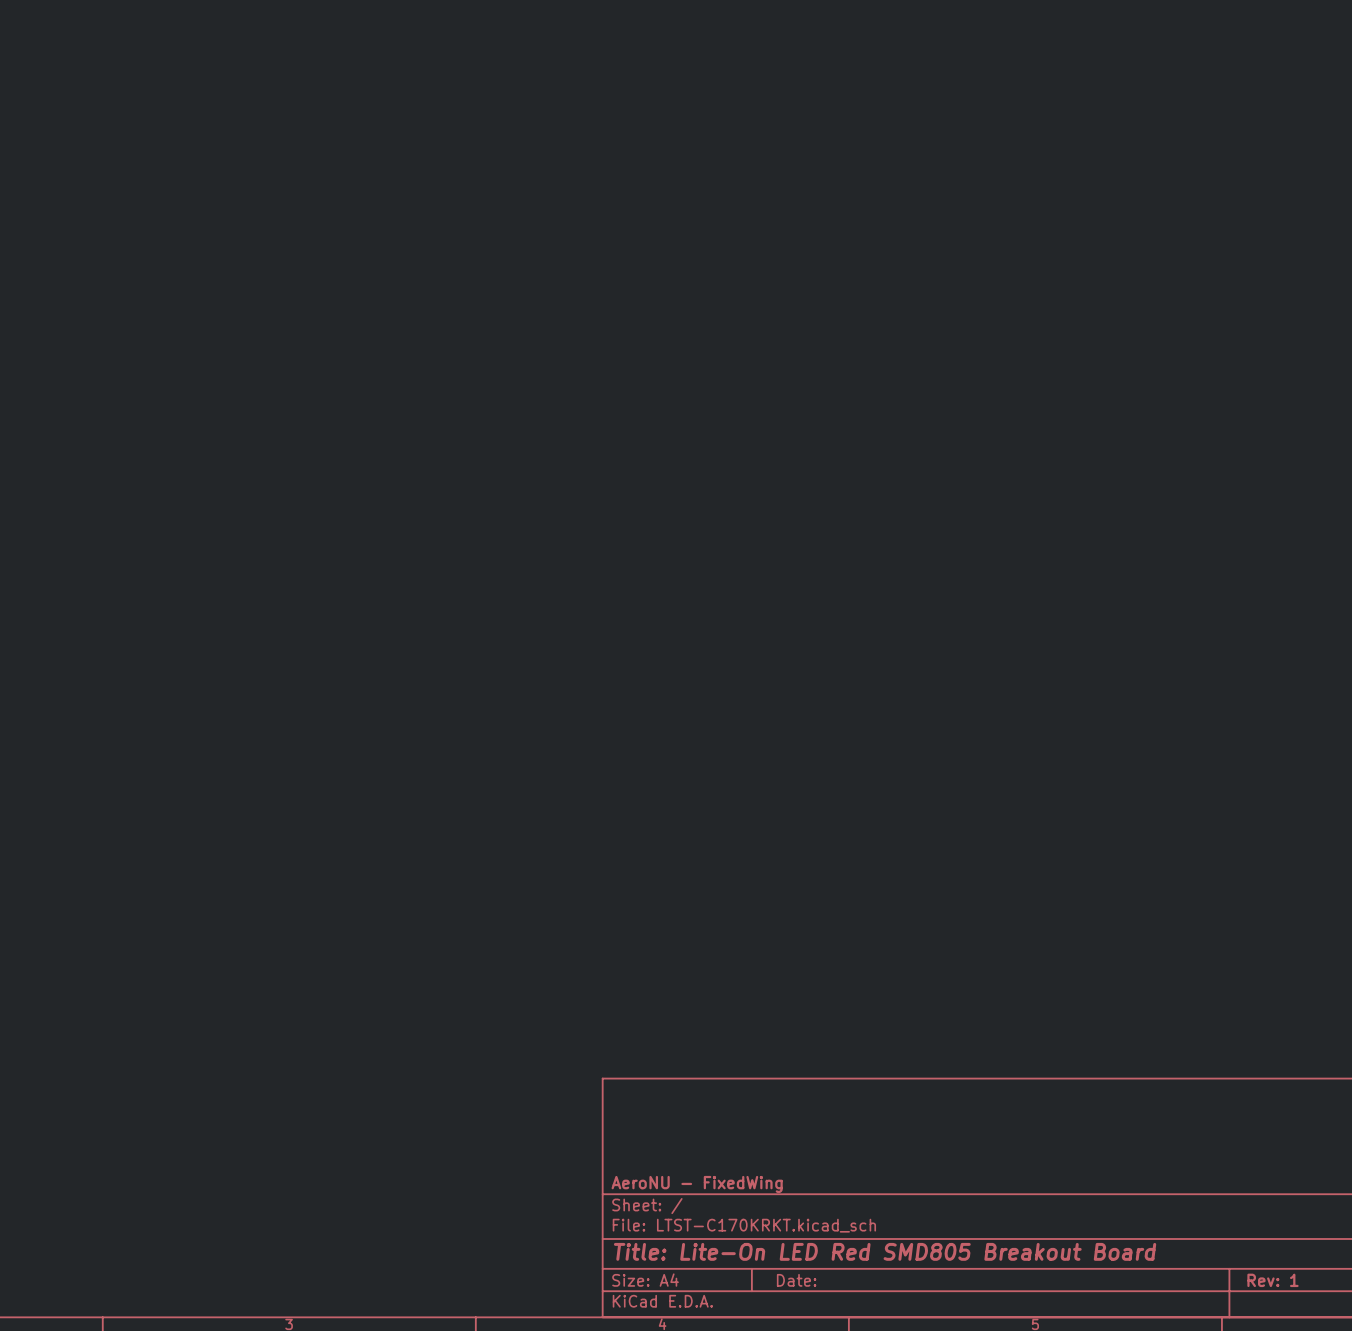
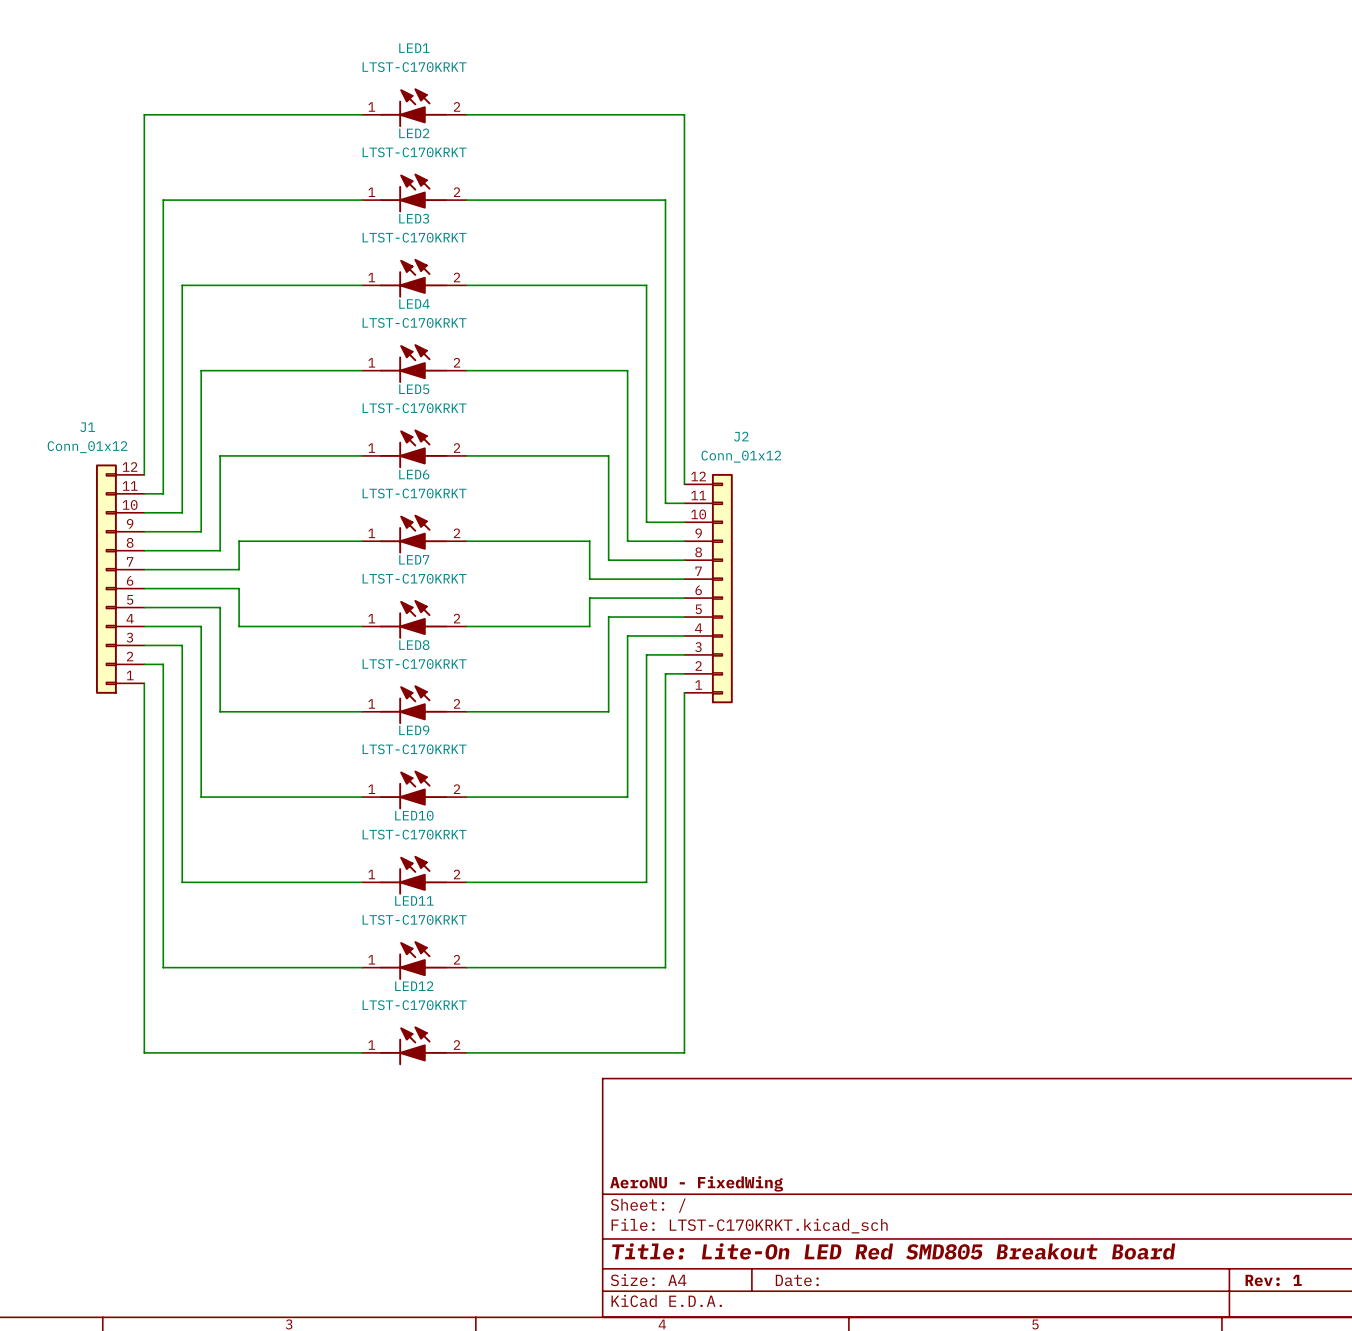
LED1: none -> LTST-C170KRKT (414, 107)
wire: none -> (362, 114) (144, 114) (144, 474)
wire: none -> (466, 114) (684, 114) (684, 484)
LED2: none -> LTST-C170KRKT (414, 192)
wire: none -> (362, 200) (163, 200) (163, 493) (144, 493)
wire: none -> (466, 200) (665, 200) (665, 503) (684, 503)
LED3: none -> LTST-C170KRKT (414, 278)
wire: none -> (362, 285) (182, 285) (182, 512) (144, 512)
wire: none -> (466, 285) (646, 285) (646, 522) (684, 522)
LED4: none -> LTST-C170KRKT (414, 363)
wire: none -> (362, 370) (201, 370) (201, 531) (144, 531)
wire: none -> (466, 370) (627, 370) (627, 541) (684, 541)
LED5: none -> LTST-C170KRKT (414, 448)
wire: none -> (362, 455) (220, 455) (220, 550) (144, 550)
wire: none -> (466, 455) (608, 455) (608, 560) (684, 560)
LED6: none -> LTST-C170KRKT (414, 534)
wire: none -> (362, 541) (239, 541) (239, 569) (144, 569)
wire: none -> (466, 541) (589, 541) (589, 579) (684, 579)
J1: none -> Conn_01x12 (120, 579)
wire: none -> (144, 588) (239, 588) (239, 626) (362, 626)
J2: none -> Conn_01x12 (708, 588)
wire: none -> (684, 598) (589, 598) (589, 626) (466, 626)
wire: none -> (144, 607) (220, 607) (220, 711) (362, 711)
wire: none -> (684, 617) (608, 617) (608, 711) (466, 711)
LED7: none -> LTST-C170KRKT (414, 619)
wire: none -> (144, 626) (201, 626) (201, 797) (362, 797)
wire: none -> (684, 635) (627, 635) (627, 797) (466, 797)
wire: none -> (144, 645) (182, 645) (182, 882) (362, 882)
wire: none -> (684, 654) (646, 654) (646, 882) (466, 882)
wire: none -> (144, 664) (163, 664) (163, 967) (362, 967)
wire: none -> (684, 673) (665, 673) (665, 967) (466, 967)
wire: none -> (144, 683) (144, 1052) (362, 1052)
wire: none -> (684, 692) (684, 1052) (466, 1052)
LED8: none -> LTST-C170KRKT (414, 704)
LED9: none -> LTST-C170KRKT (414, 789)
LED10: none -> LTST-C170KRKT (414, 875)
LED11: none -> LTST-C170KRKT (414, 960)
LED12: none -> LTST-C170KRKT (414, 1045)

